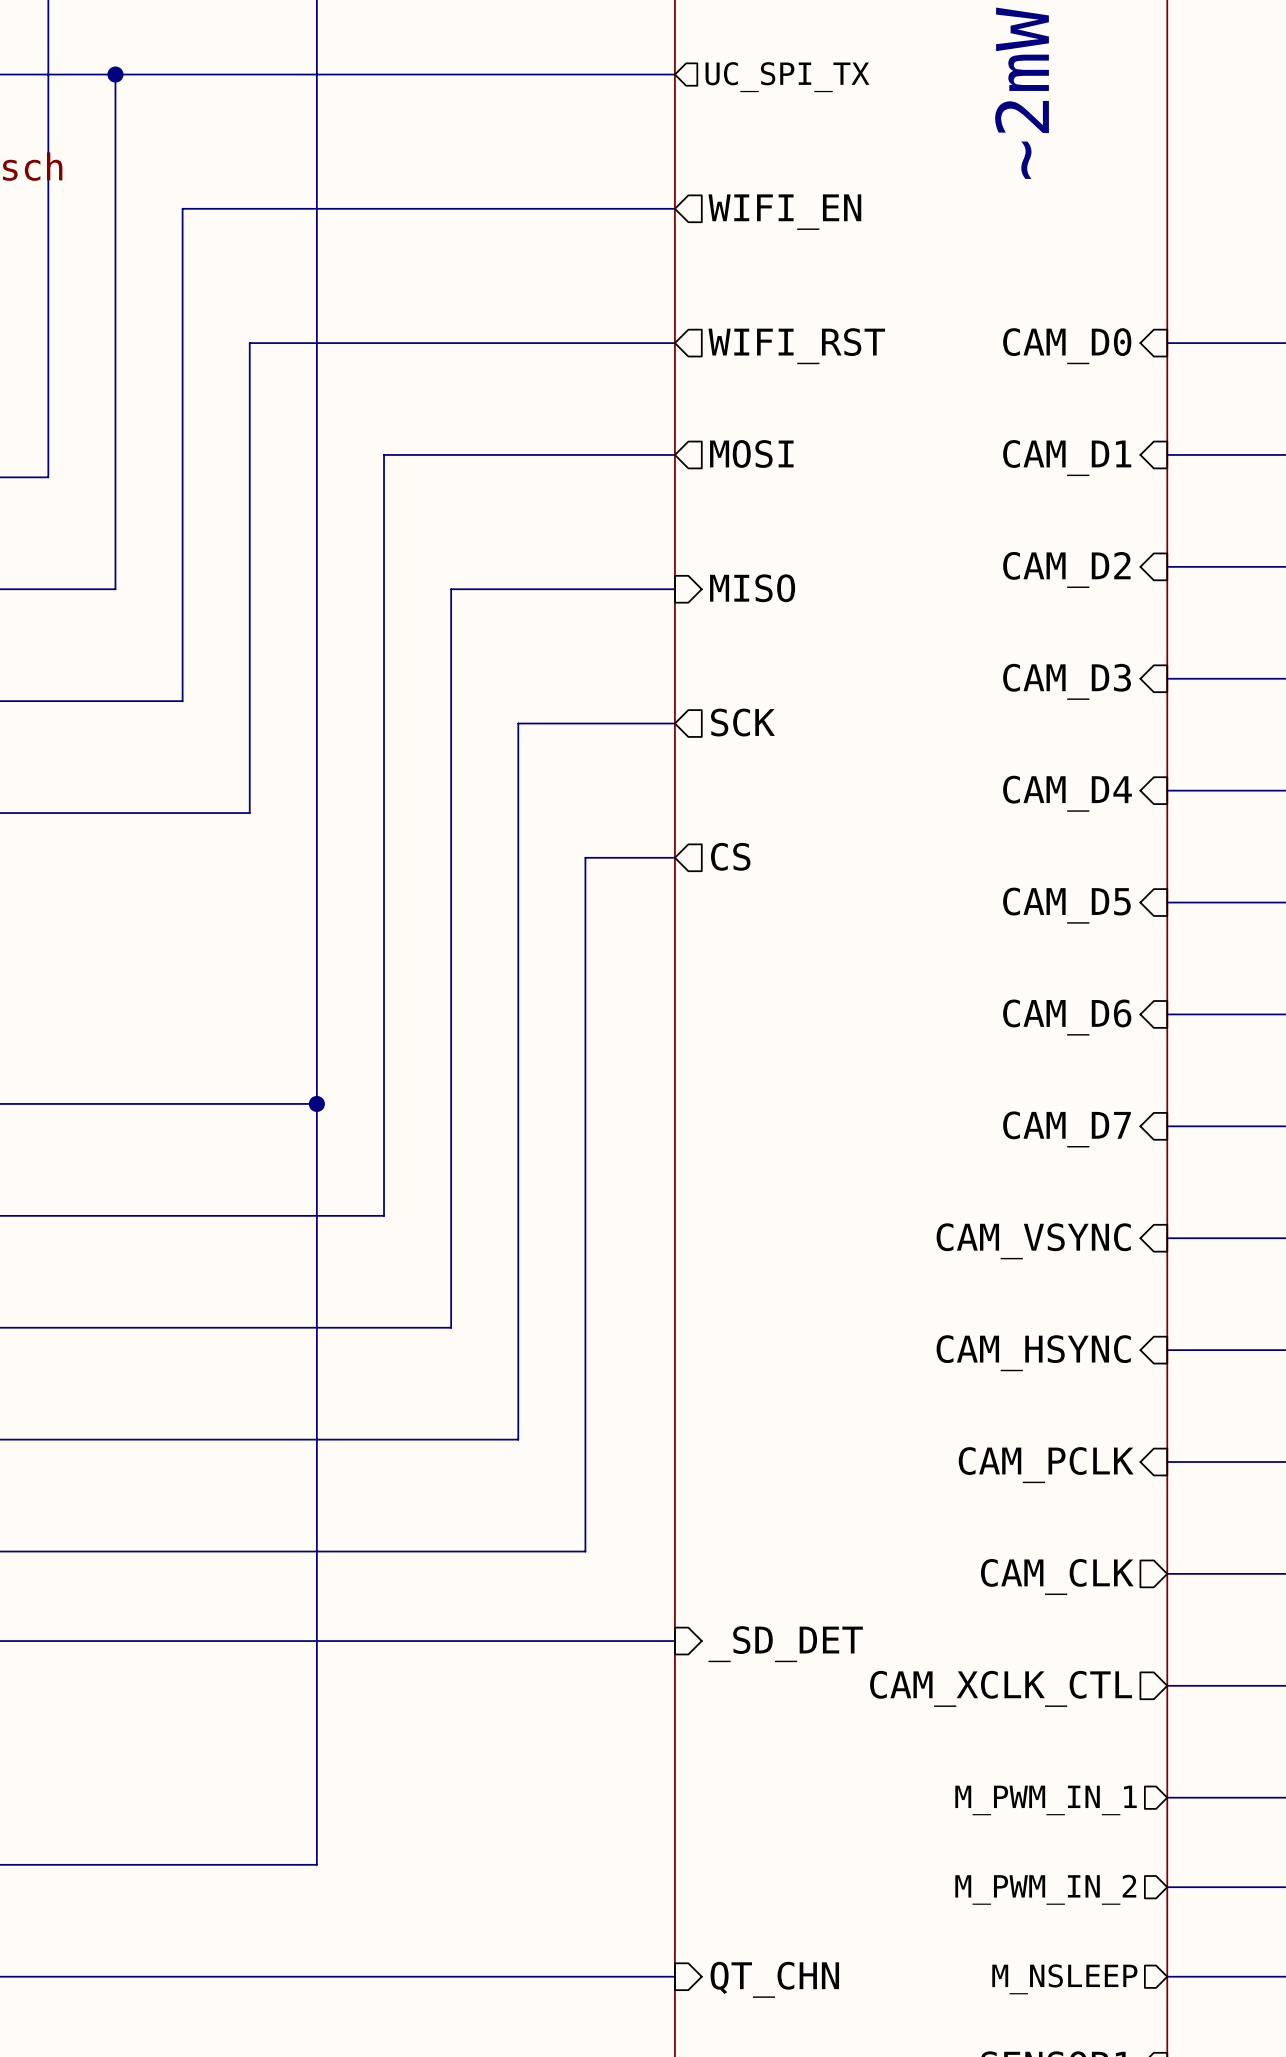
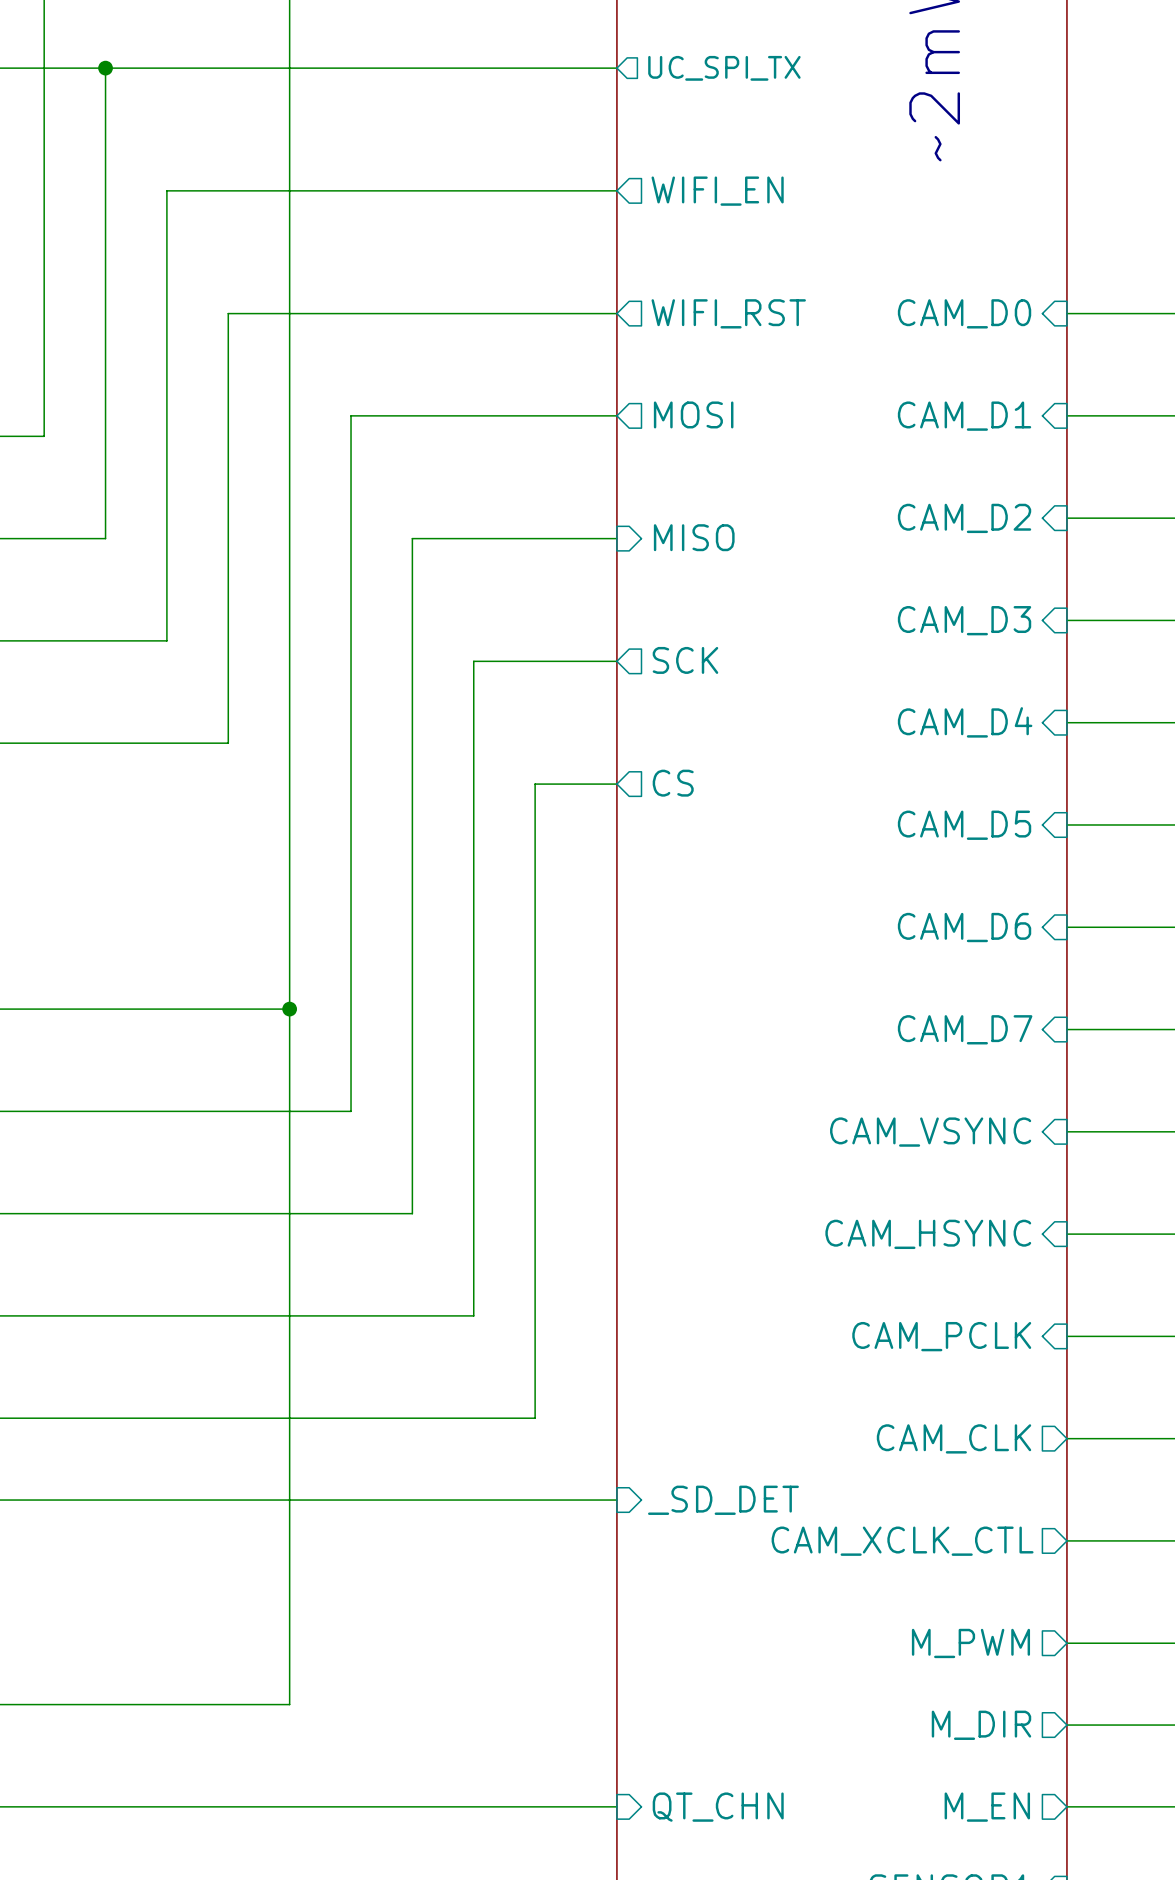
sheet pin: M_PWM_IN_1 (1046, 1800) -> M_PWM (970, 1643)
sheet pin: M_PWM_IN_2 (1045, 1889) -> M_DIR (981, 1725)
sheet pin: M_NSLEEP (1064, 1979) -> M_EN (987, 1807)

